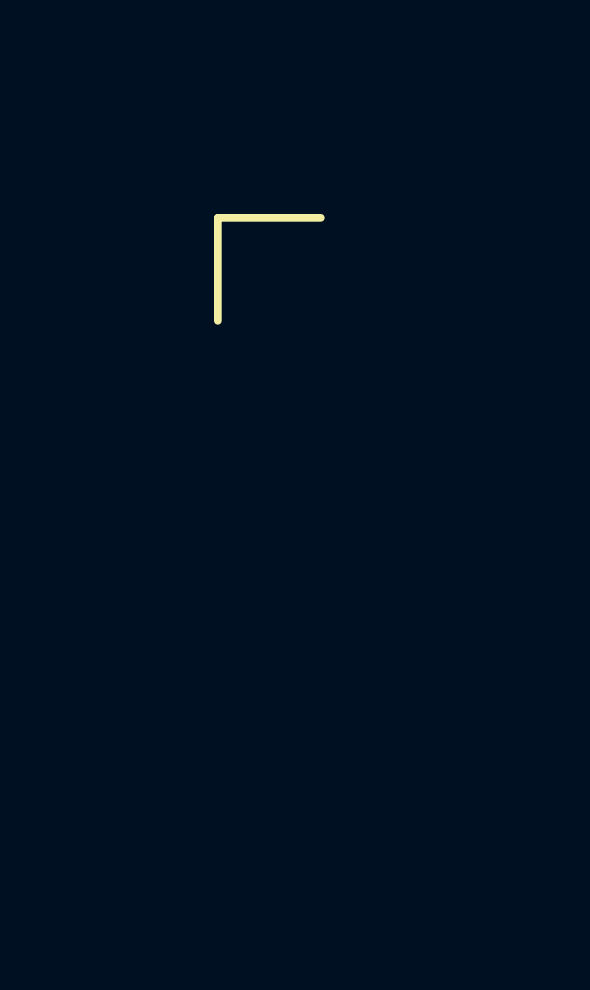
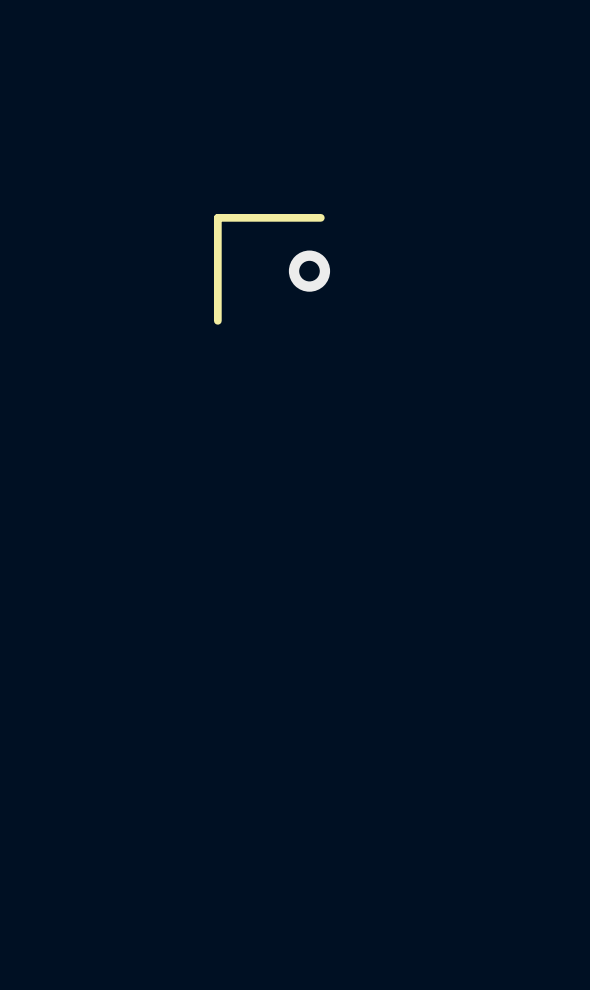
via: none -> (309, 271)

